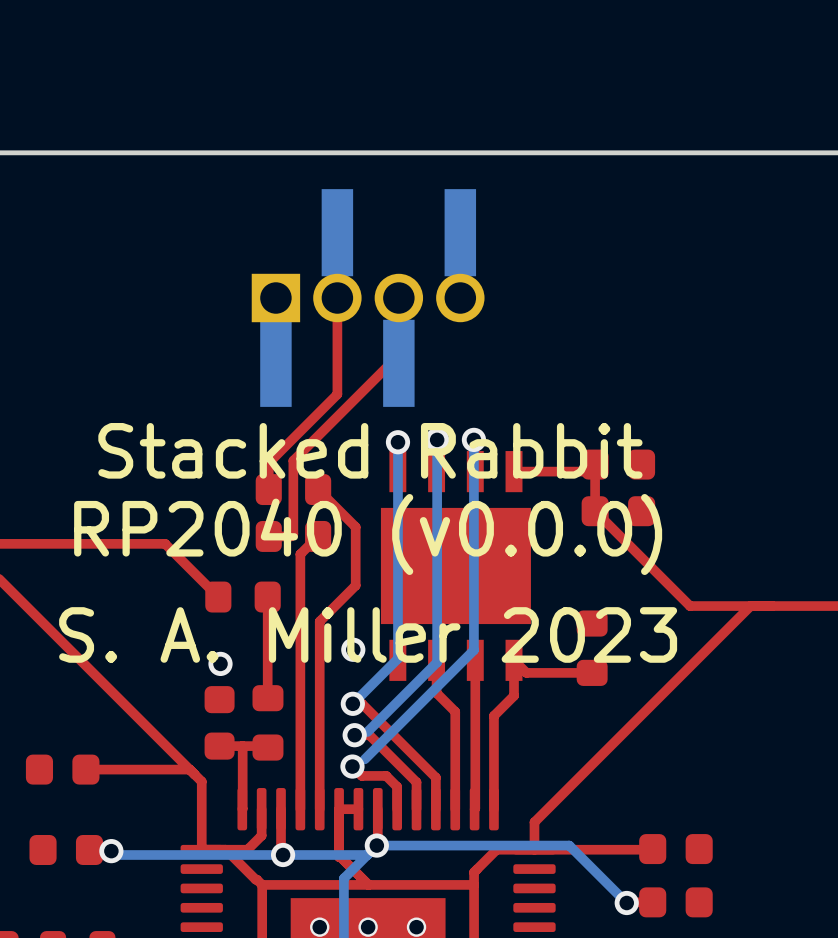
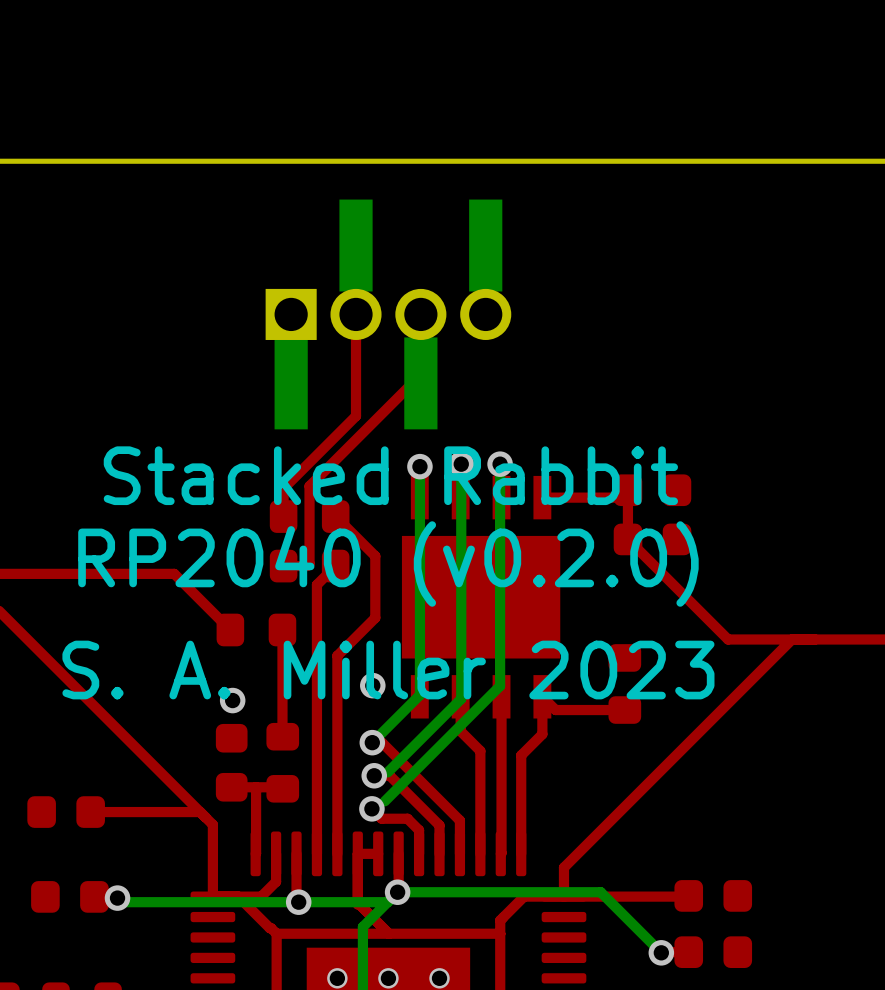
text: RP2040 (v0.0.0) (368, 534) -> RP2040 (v0.2.0) (388, 564)

